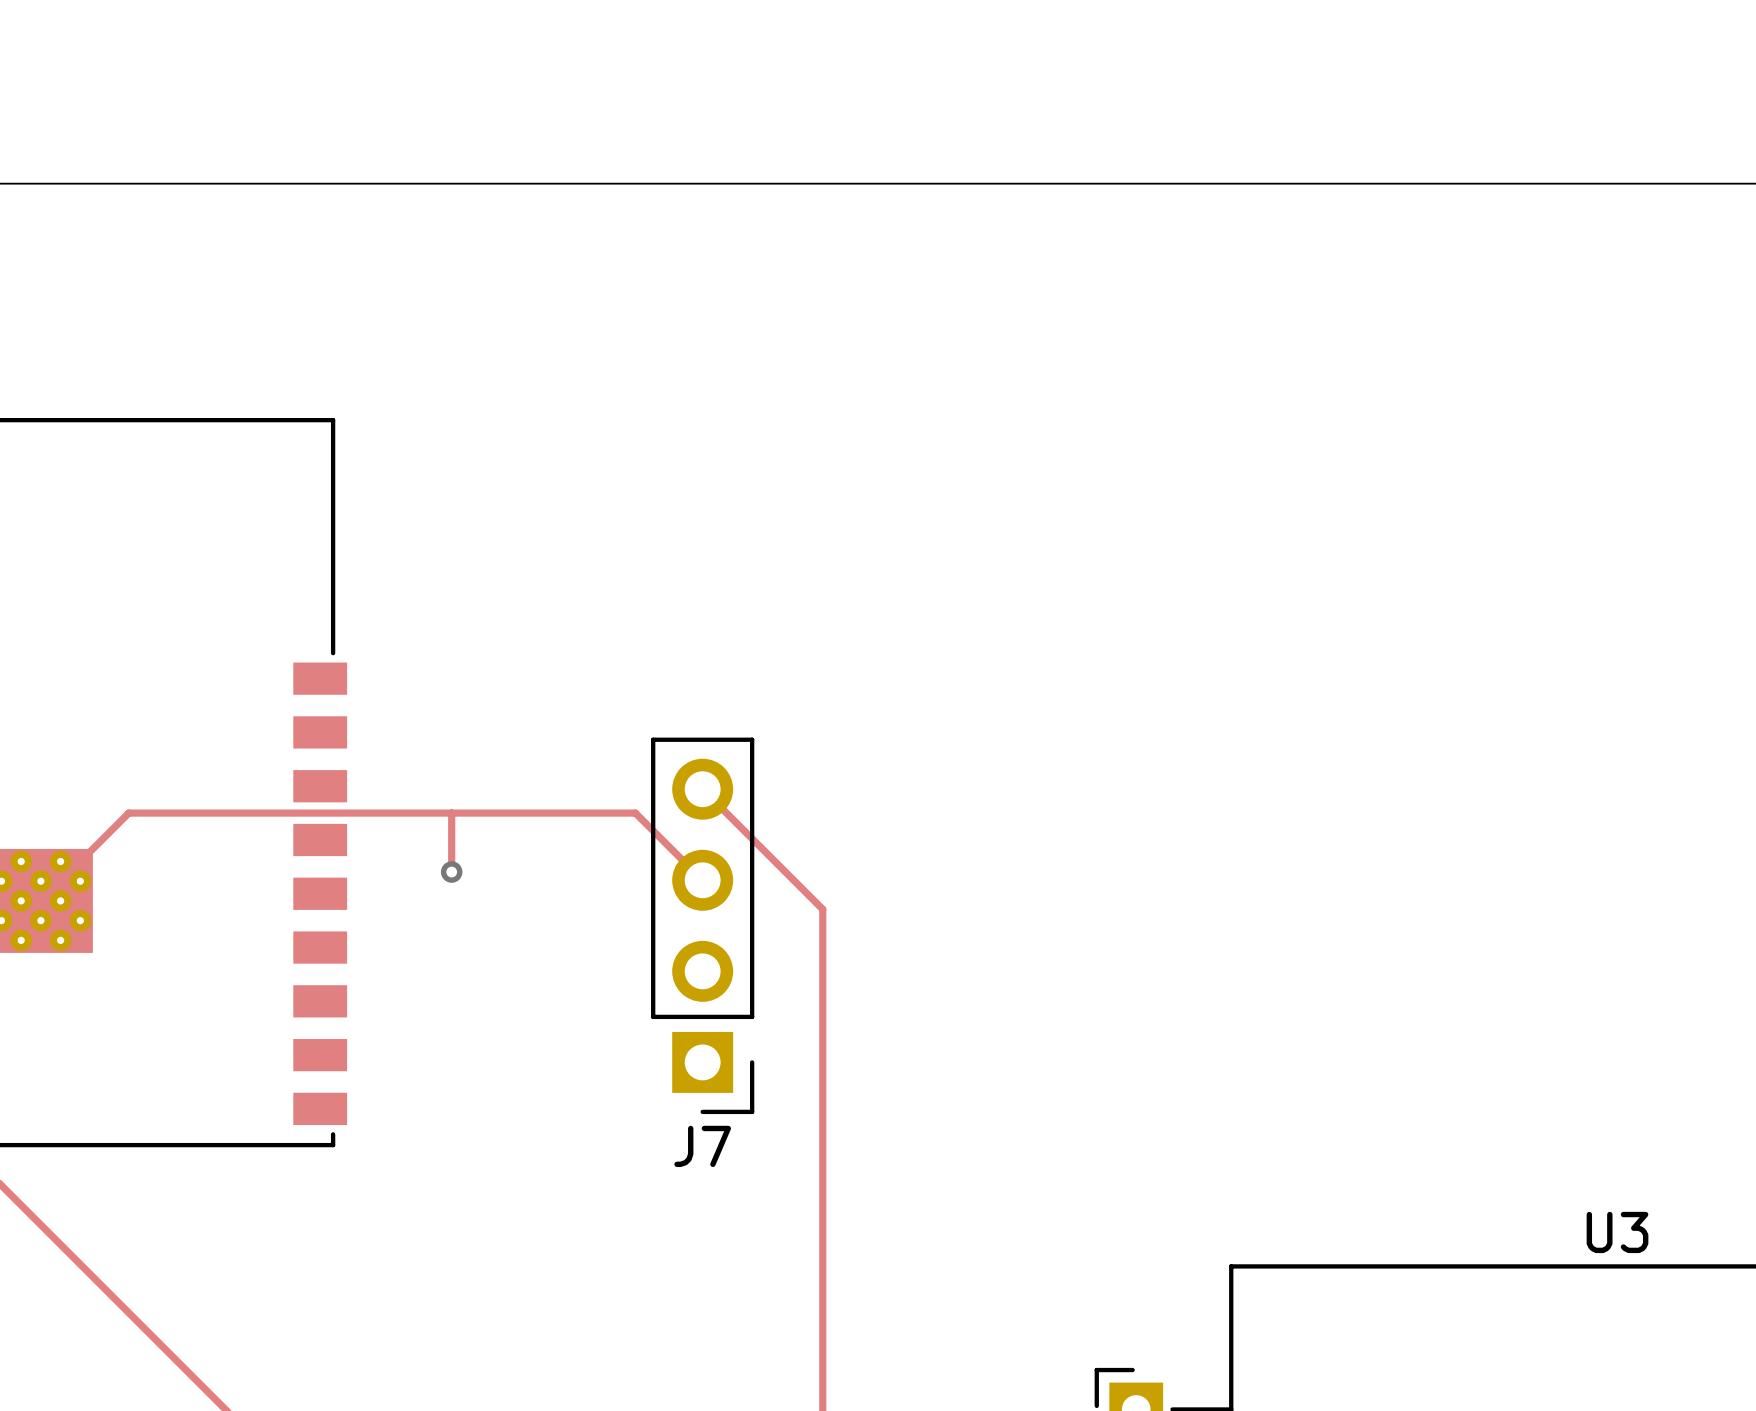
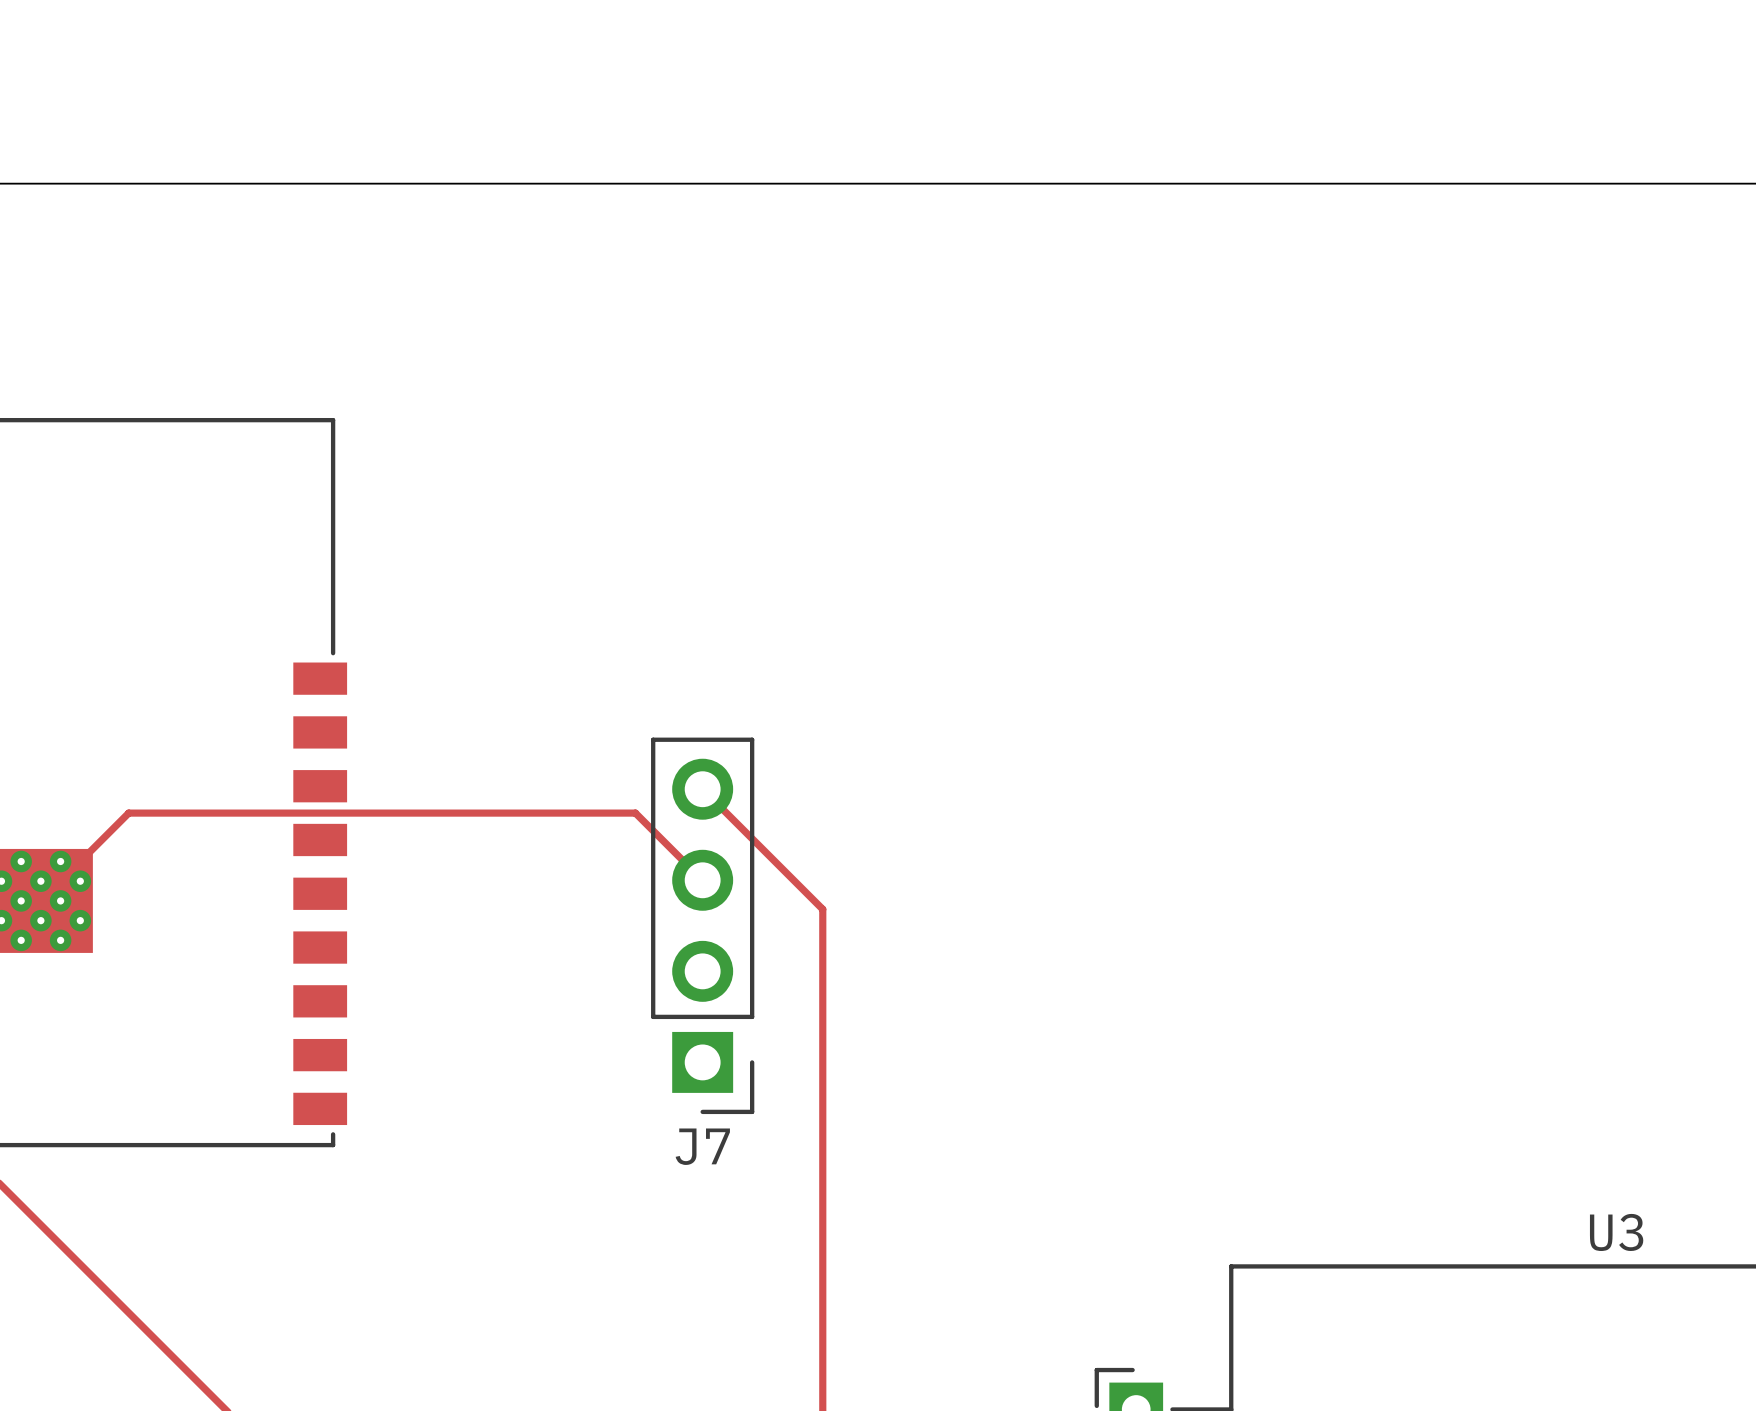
track: (451, 813) (451, 872) -> none
via: (451, 872) -> none

